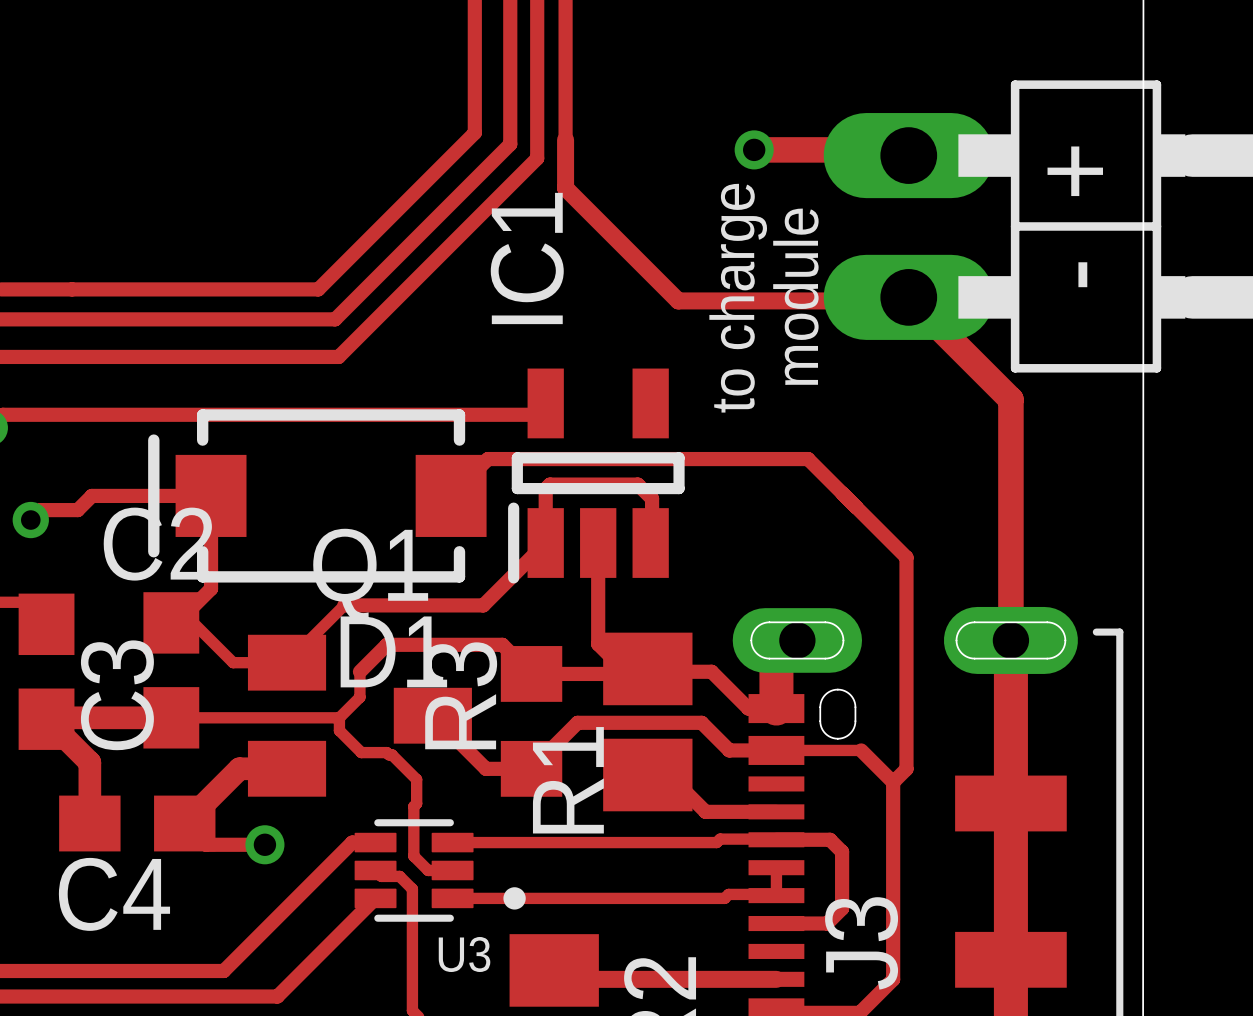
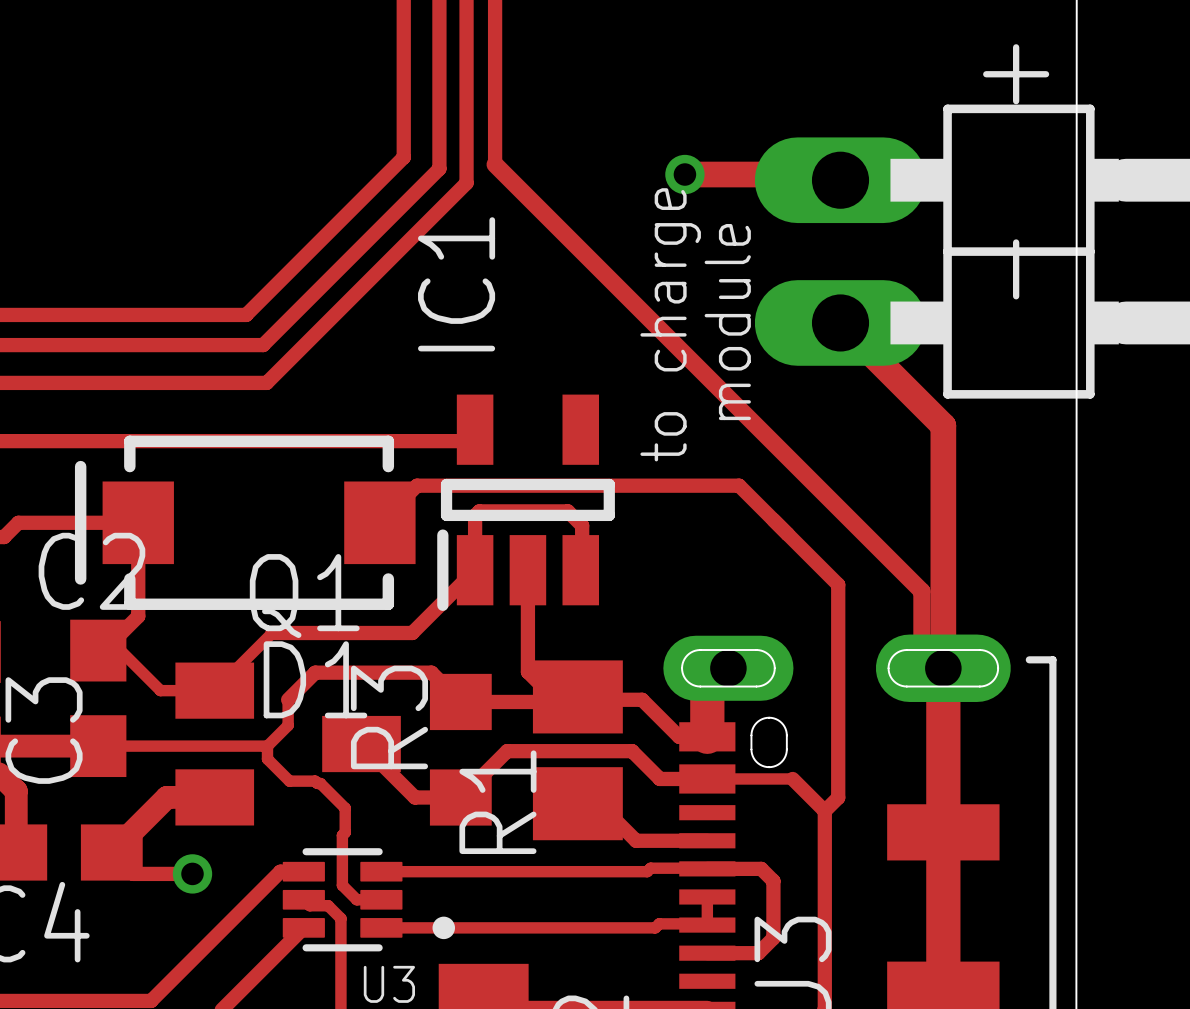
track: (565, 139) (565, 188) (678, 300) (912, 300) -> (495, 164) (921, 591) (921, 638) (943, 659)

